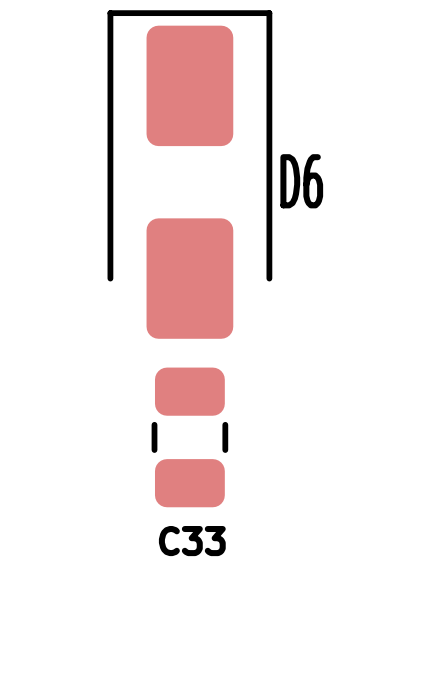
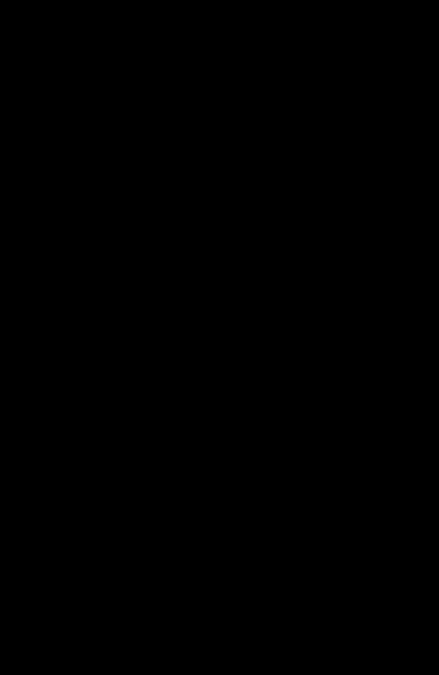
D6: (189, 174) -> none
C33: (189, 437) -> none

